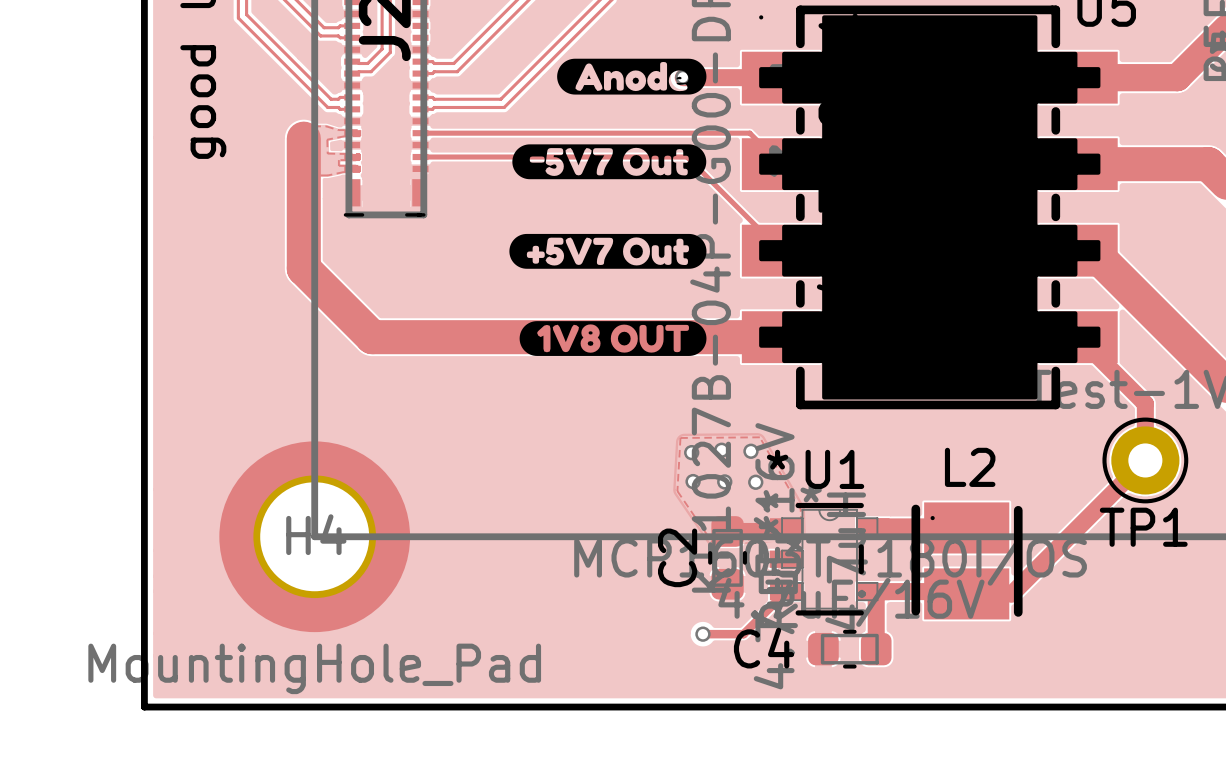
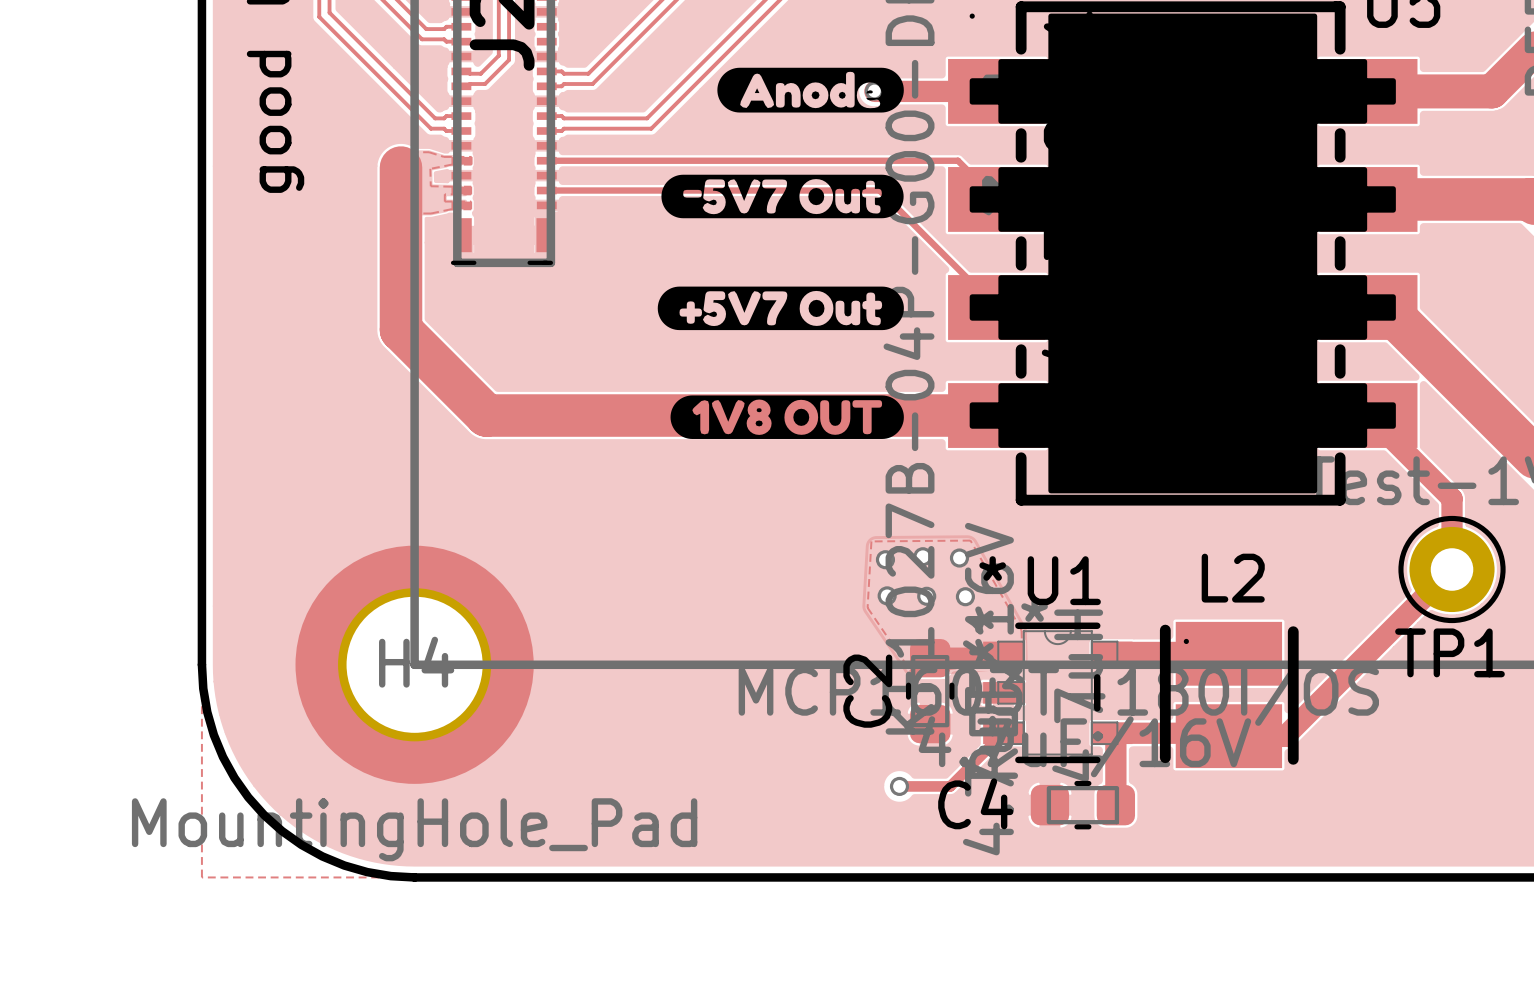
board edge: (144, 536) (144, 707) (314, 707) -> (201, 664) (207, 712) (223, 757) (234, 777) (264, 815) (301, 844) (344, 865) (390, 876) (414, 877)

